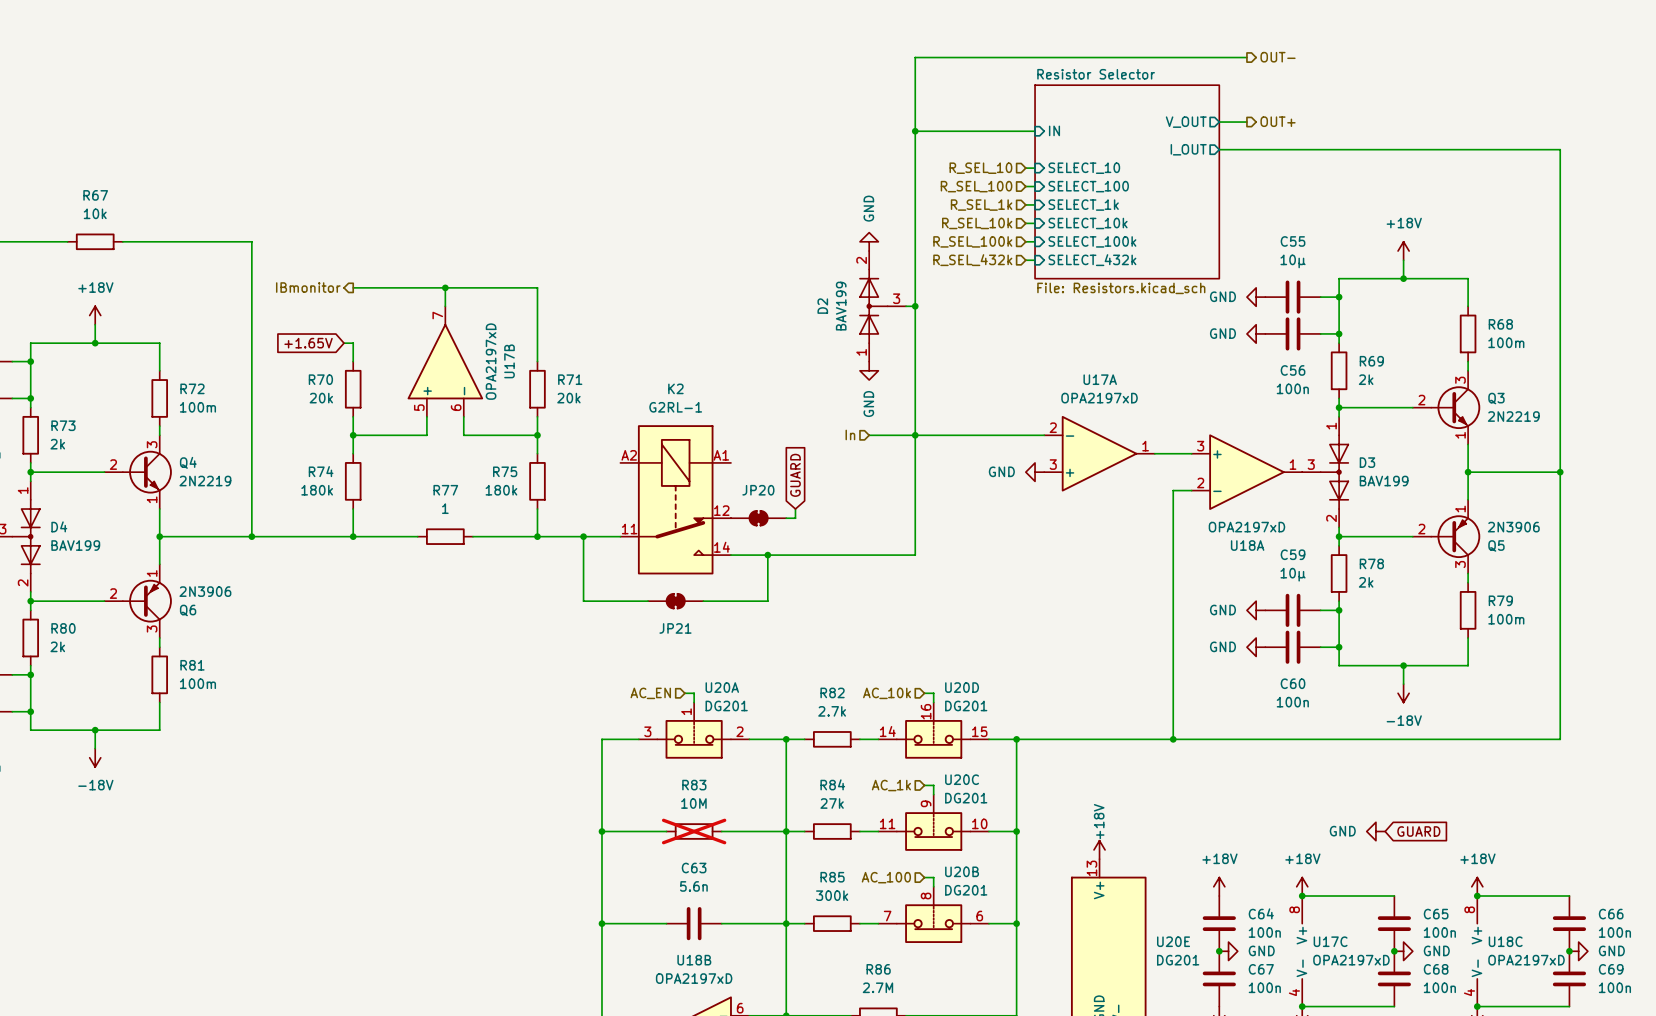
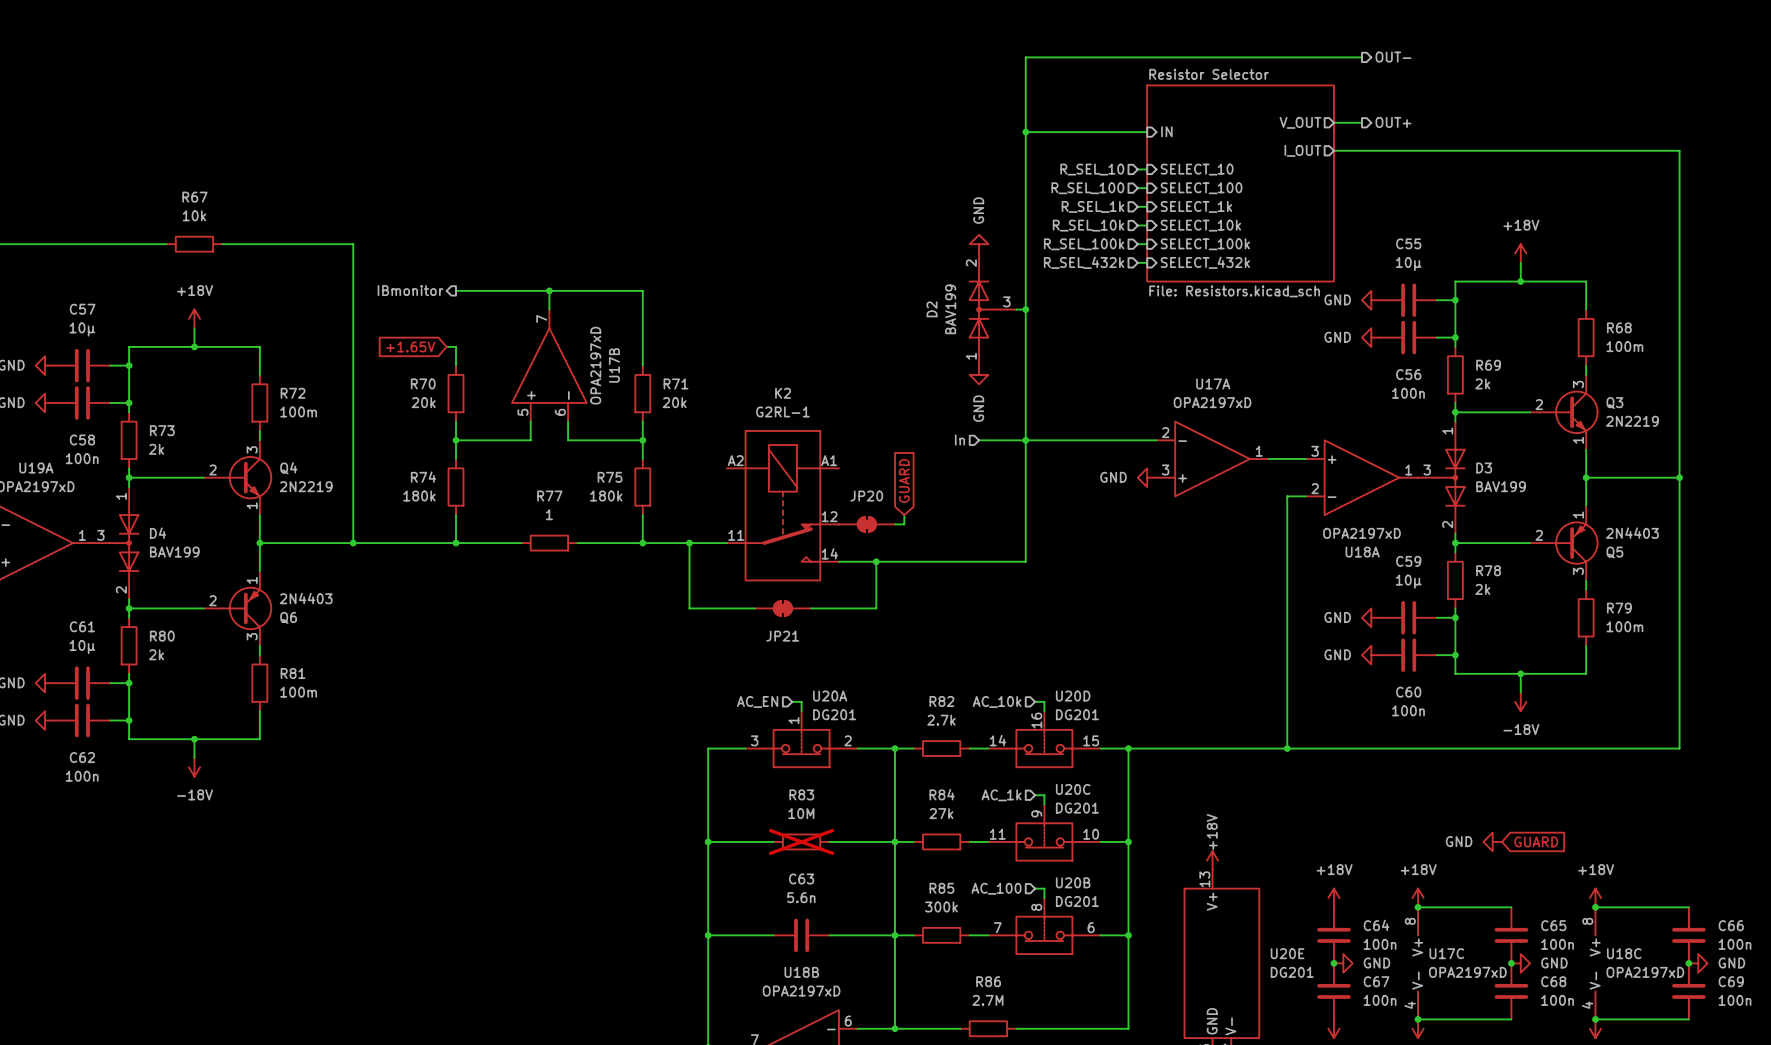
Q5 value: 2N3906 (1513, 527) -> 2N4403 (1632, 533)
Q6 value: 2N3906 (205, 591) -> 2N4403 (306, 598)

